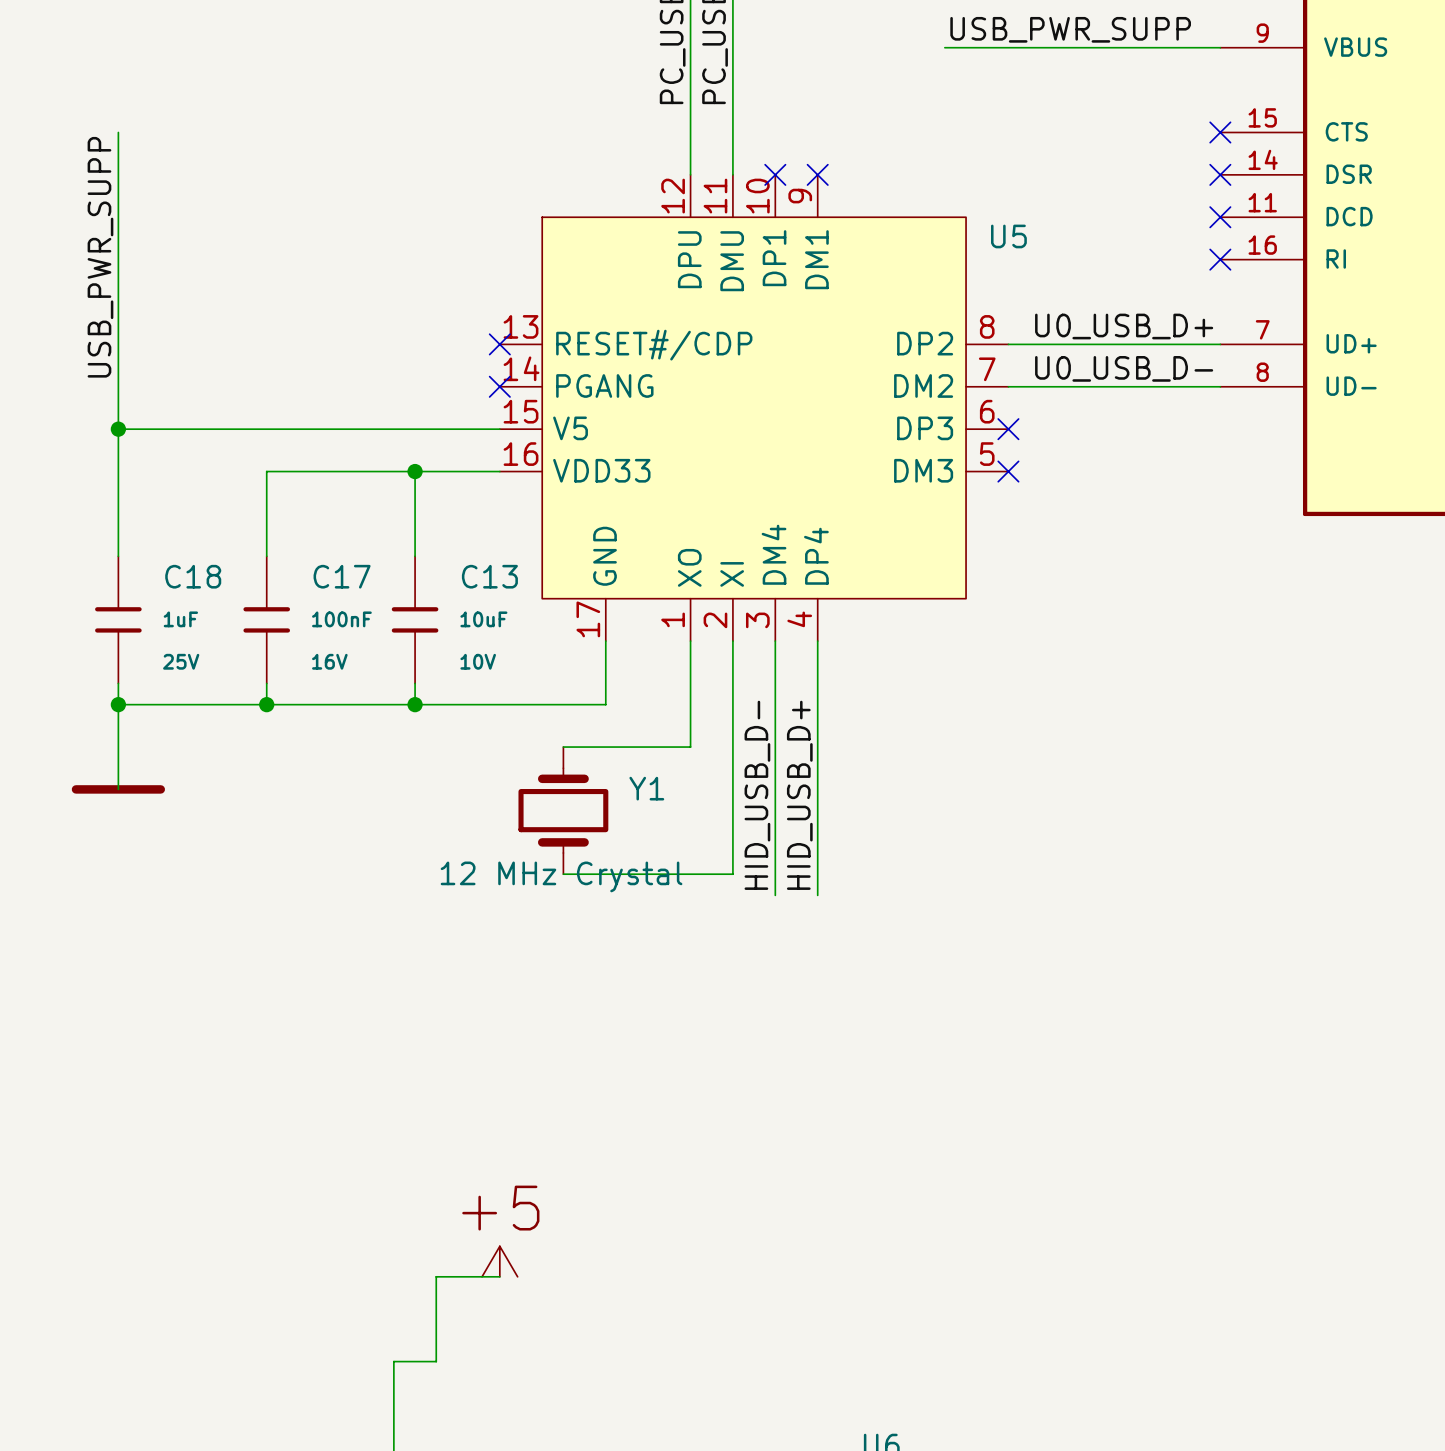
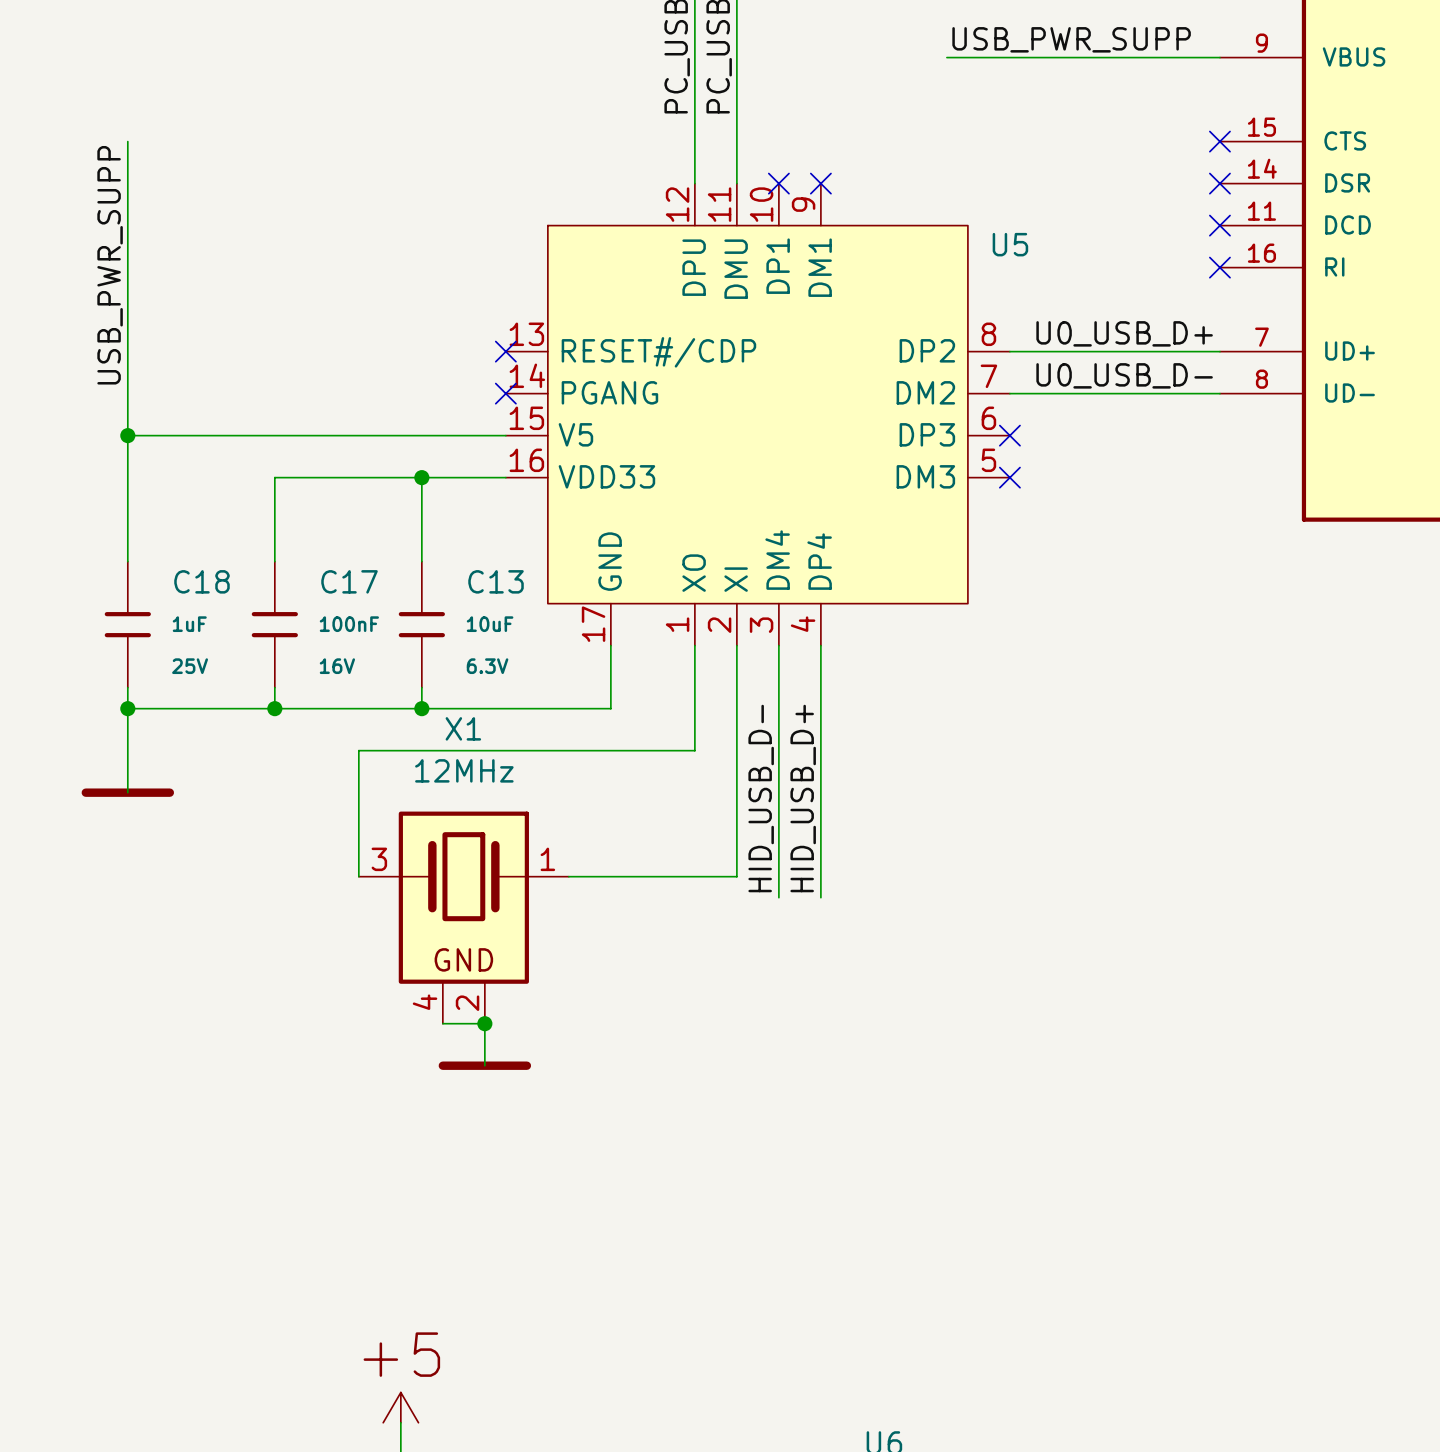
C13 text: 10V (478, 661) -> 6.3V (487, 666)
wire: none -> (568, 750) (358, 750) (358, 876)
Y1: 12 MHz Crystal (563, 810) -> none
X1: none -> 12MHz (463, 917)
wire: none -> (442, 1023) (484, 1023) (484, 1065)
junction: none -> (484, 1023)
power symbol: none -> (484, 1065)
power symbol position: (499, 1261) -> (400, 1407)
wire: (499, 1276) (436, 1276) (436, 1361) (393, 1361) (393, 1425) -> none

